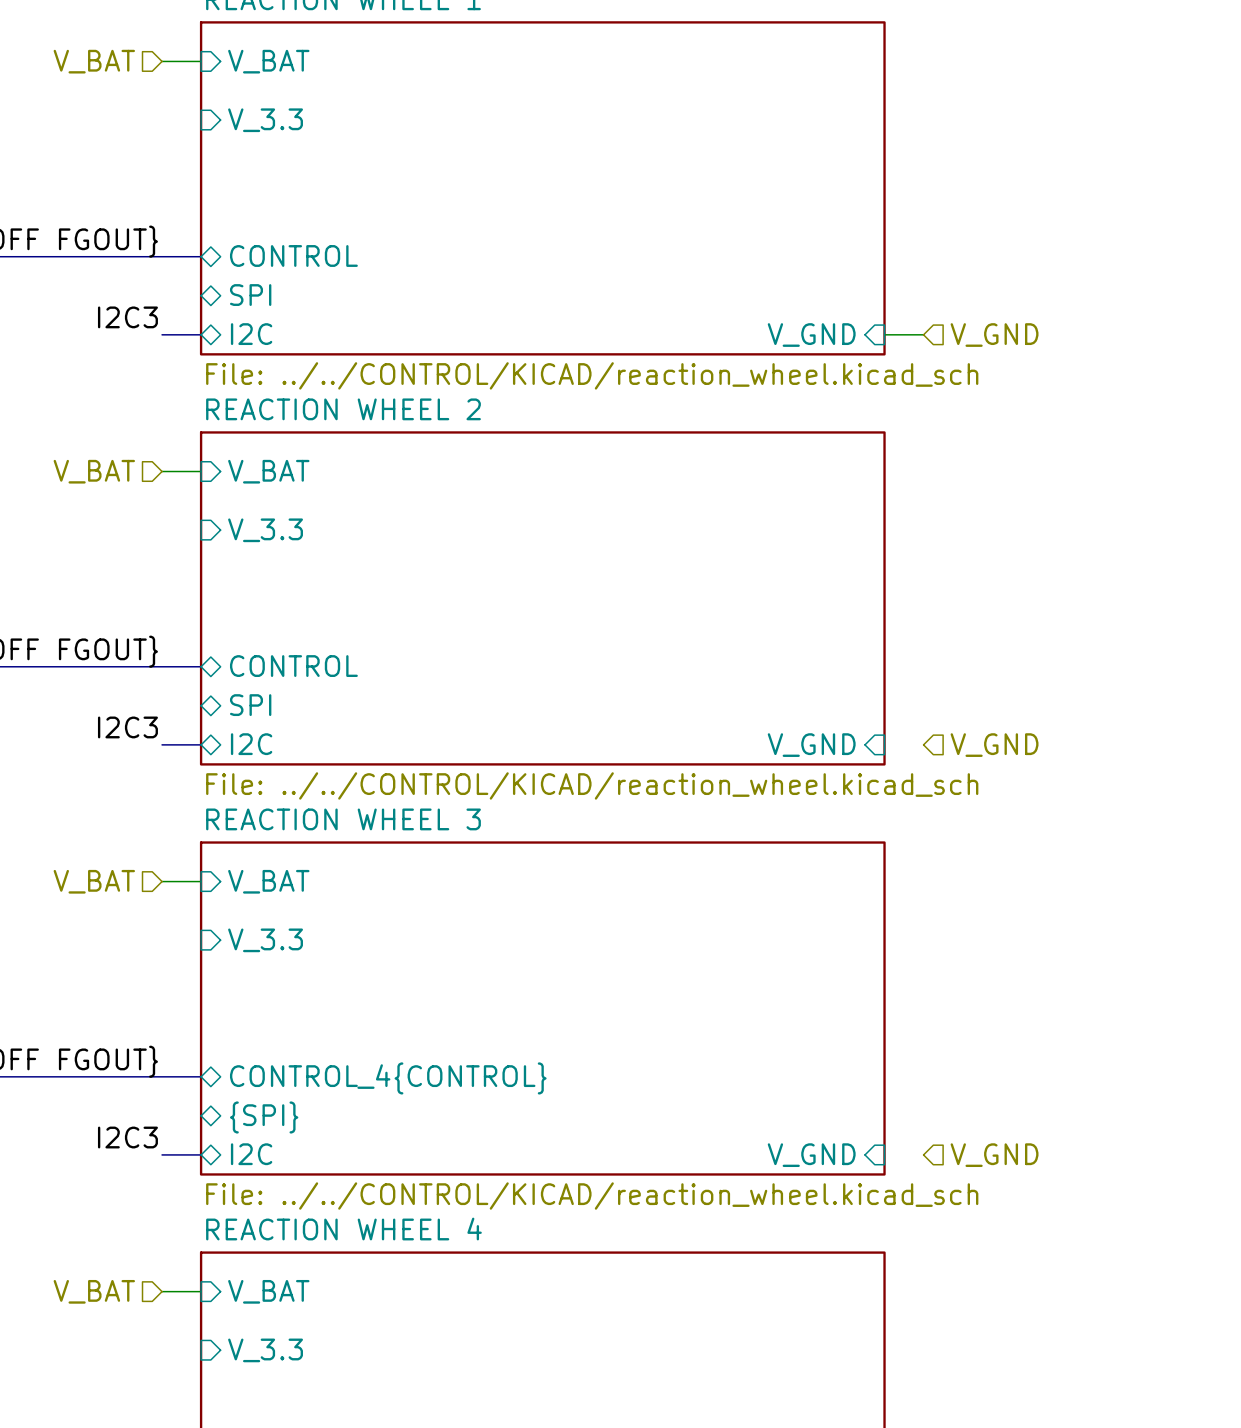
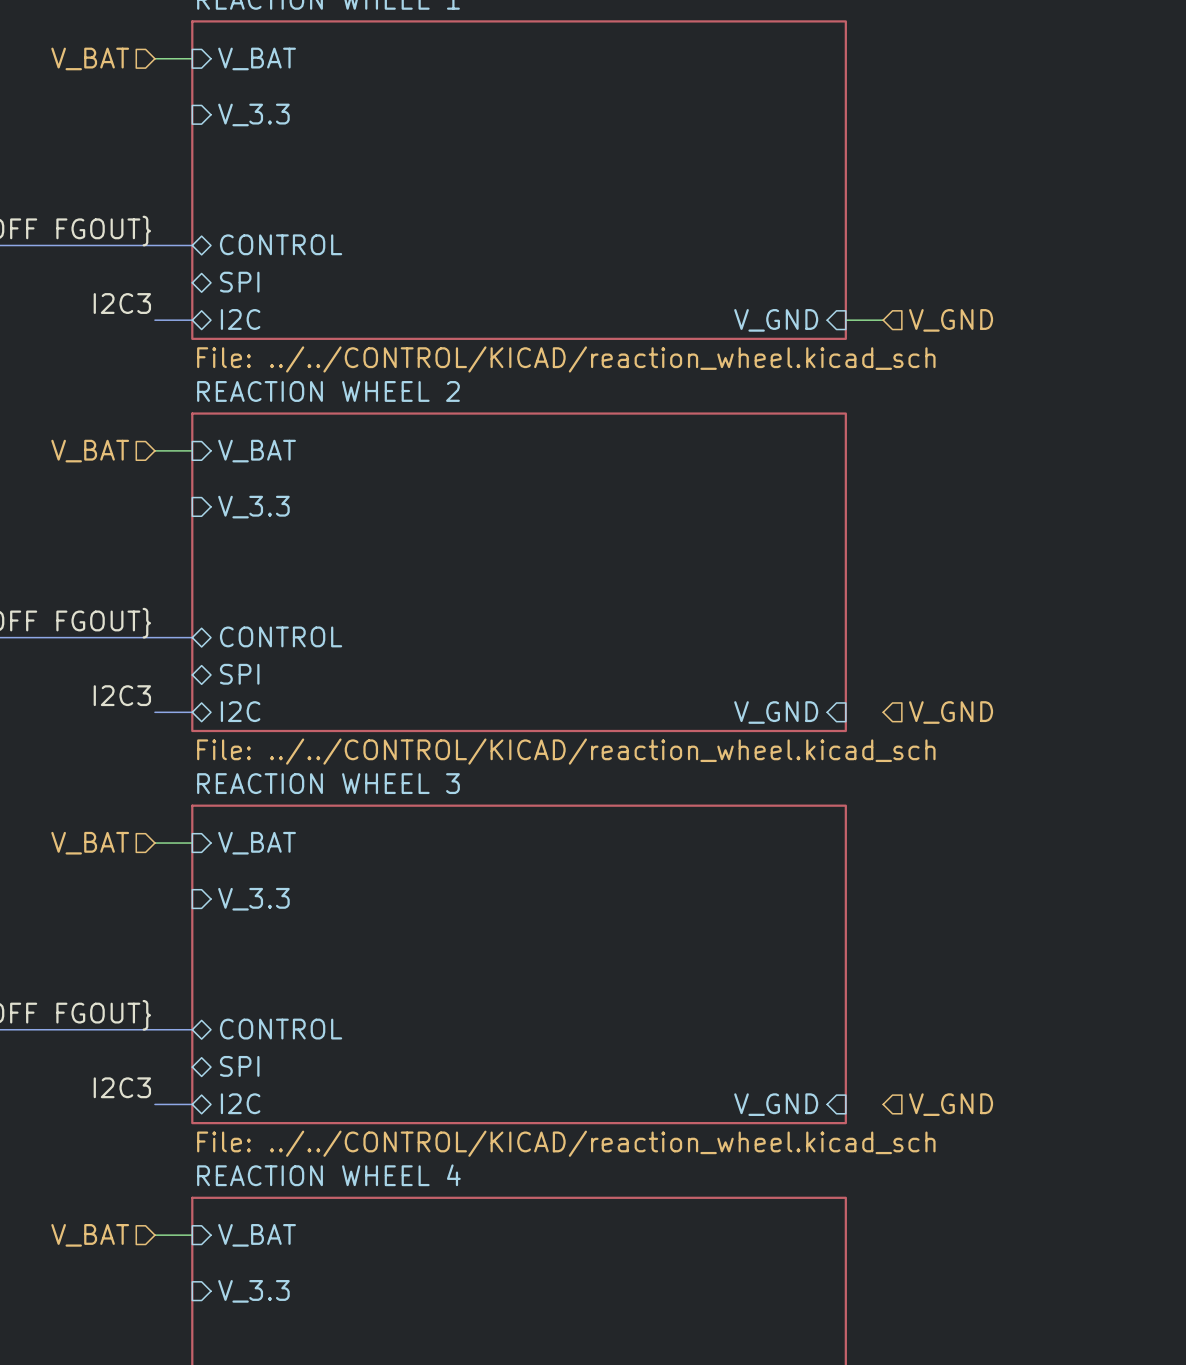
sheet pin: CONTROL_4{CONTROL} (388, 1078) -> CONTROL (281, 1029)
sheet pin: {SPI} (264, 1117) -> SPI (239, 1066)

